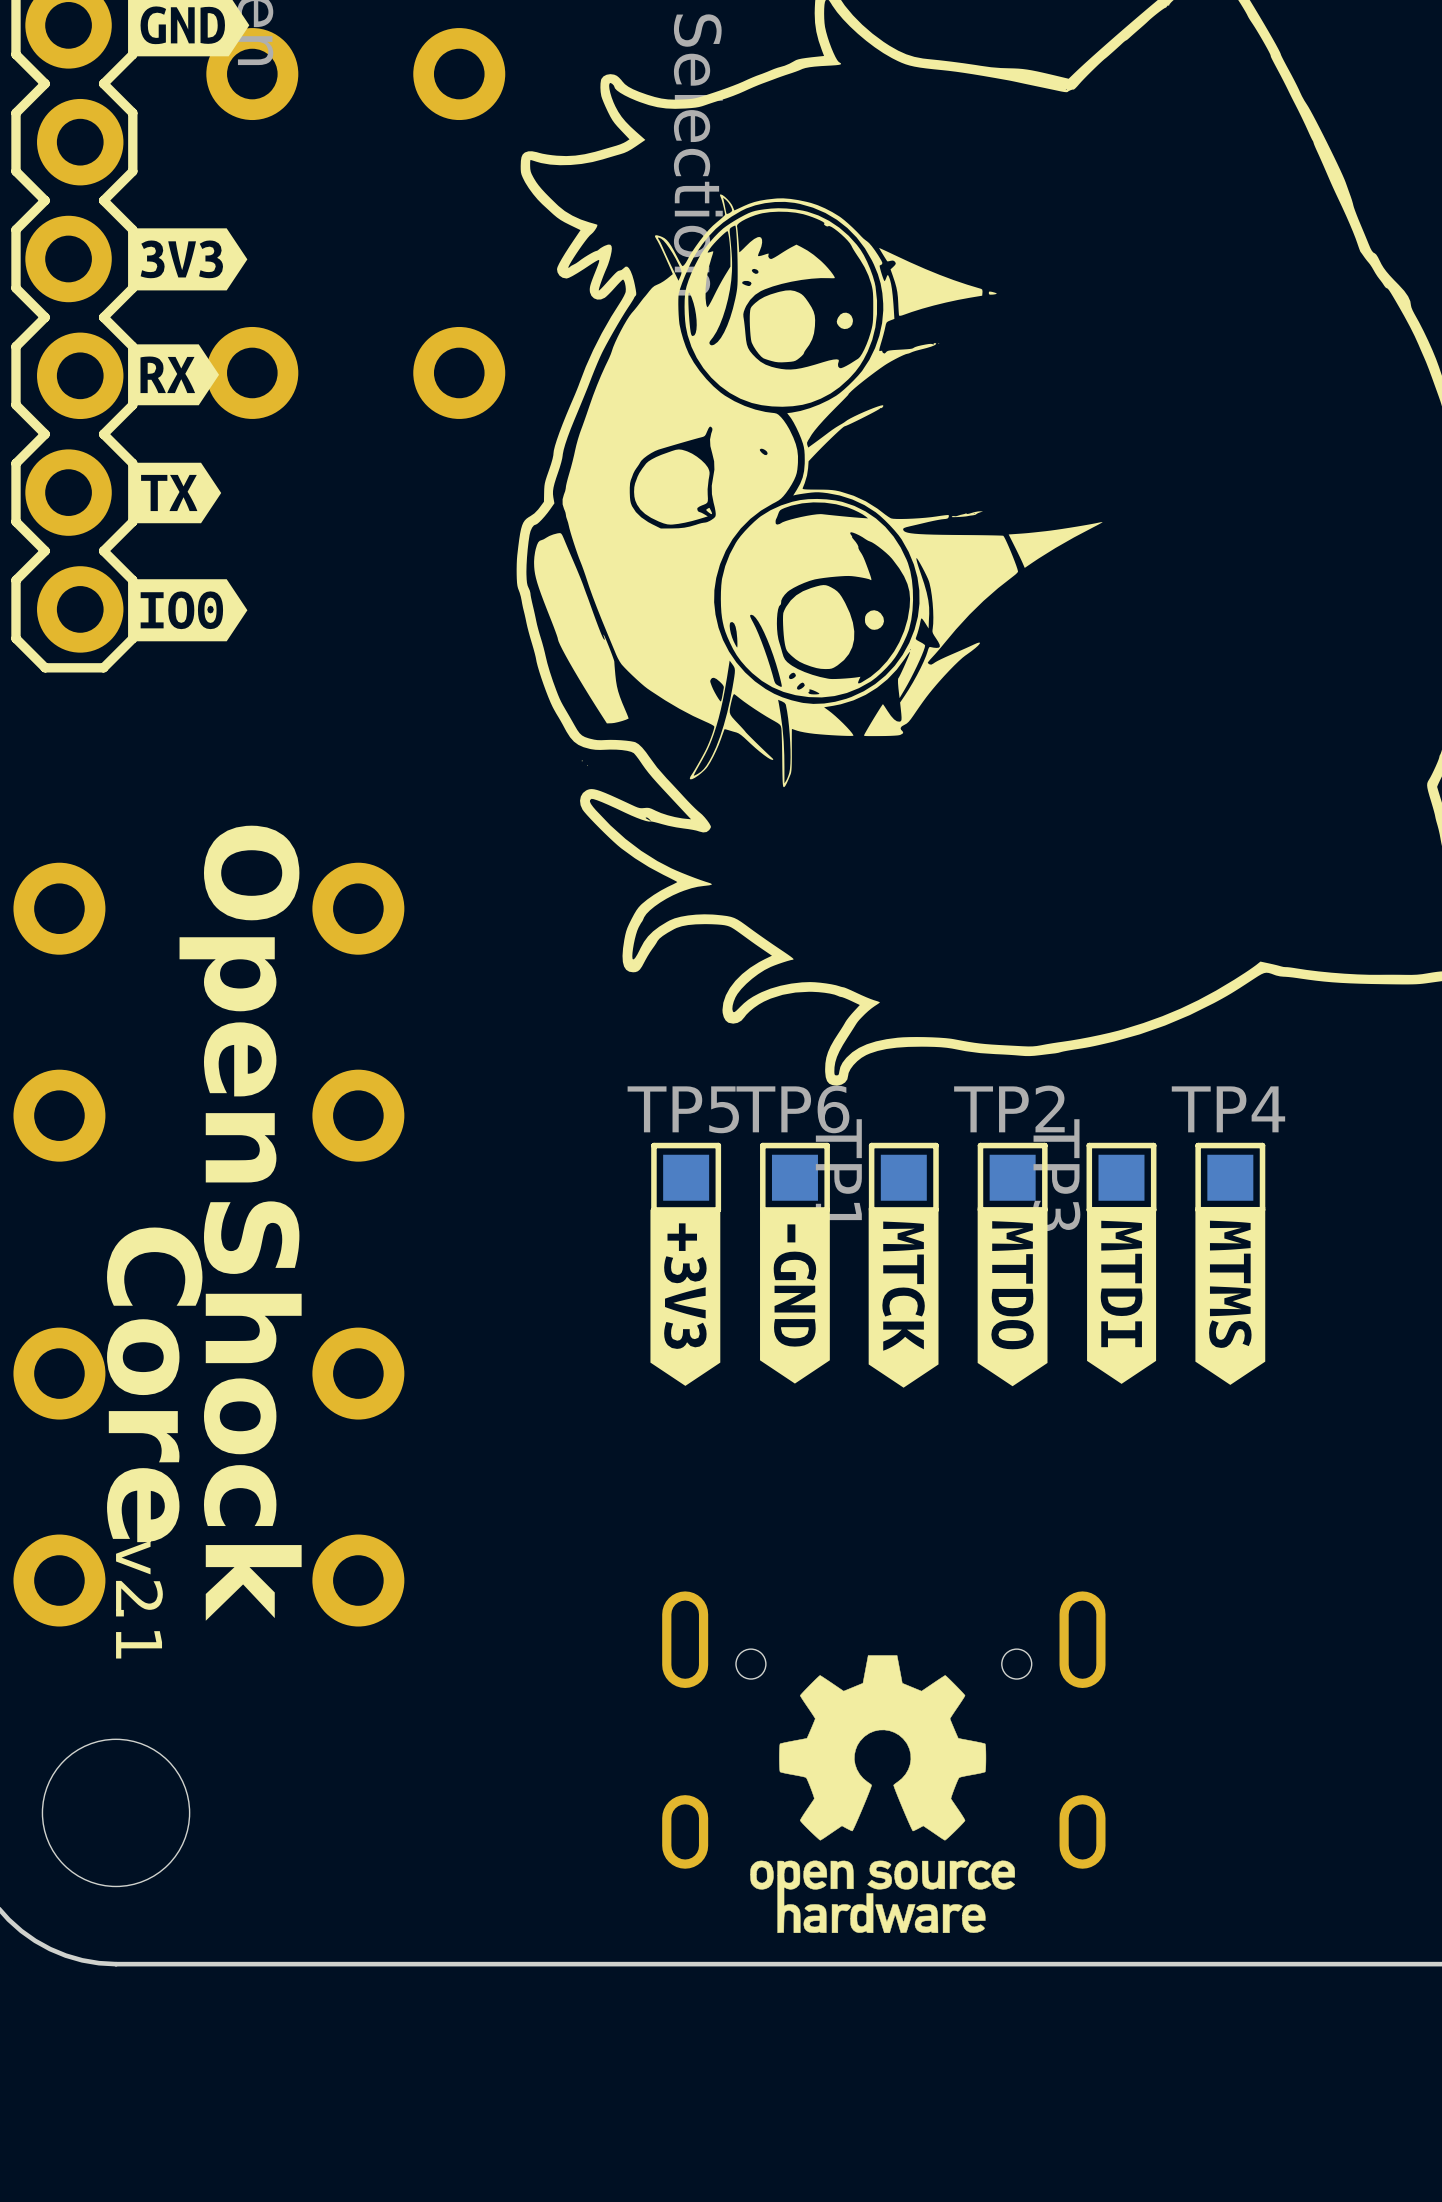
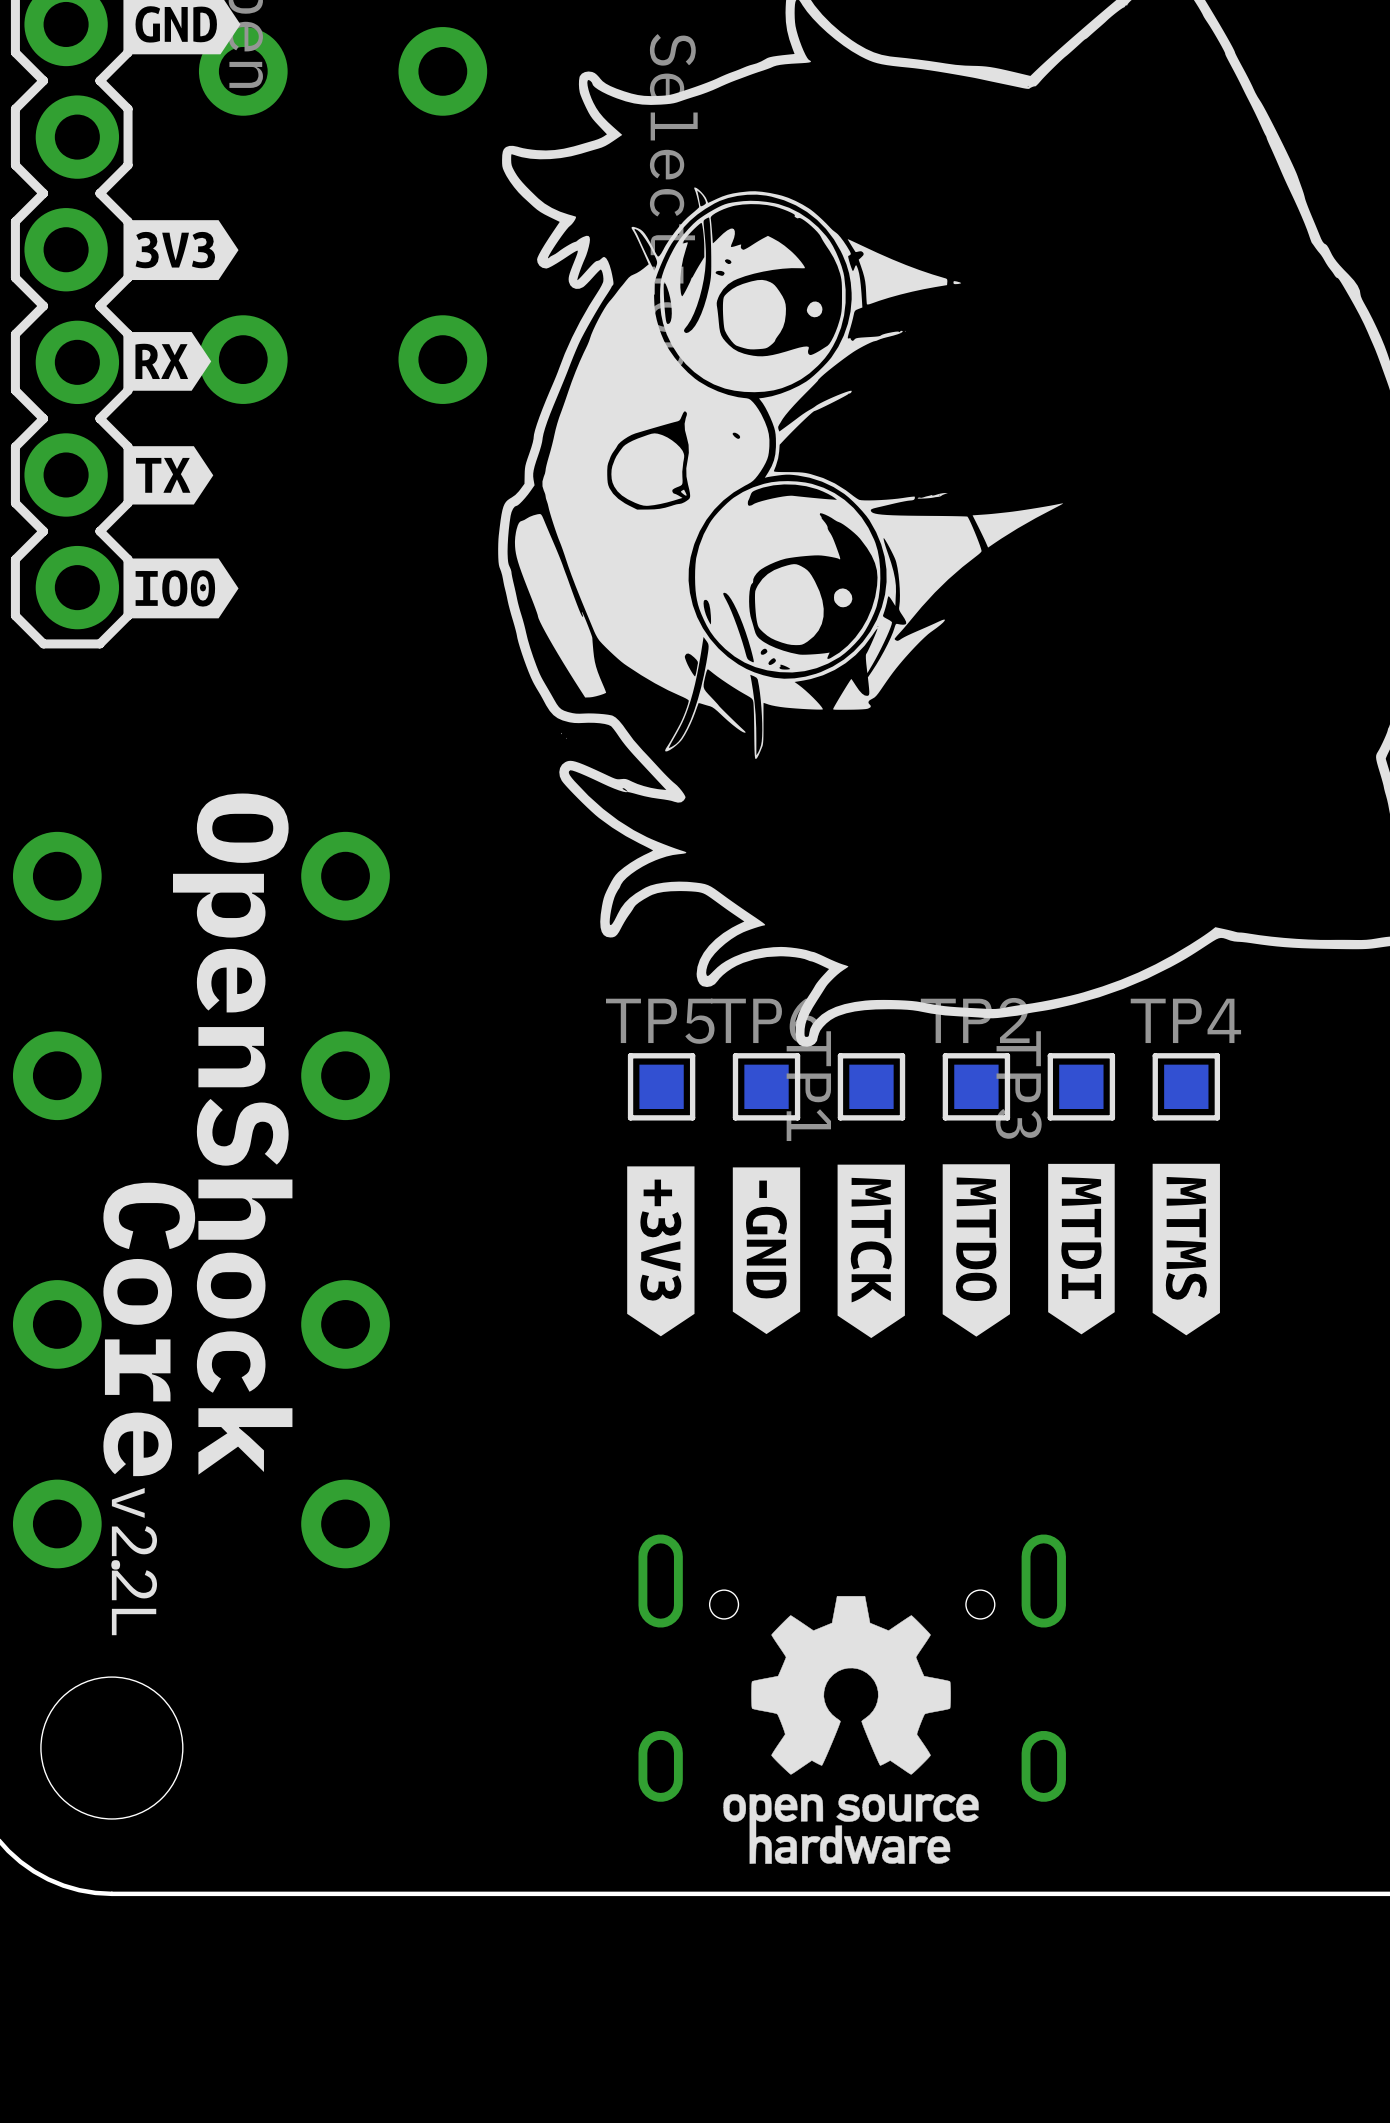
TP5 position: (686, 1177) -> (661, 1086)
TP6 position: (794, 1177) -> (766, 1086)
TP1 position: (903, 1177) -> (871, 1086)
TP2 position: (1012, 1177) -> (976, 1086)
TP3 position: (1121, 1177) -> (1081, 1086)
TP4 position: (1230, 1177) -> (1186, 1086)
text: 1 (139, 1644) -> 2 (134, 1585)
text: none -> L (134, 1622)

